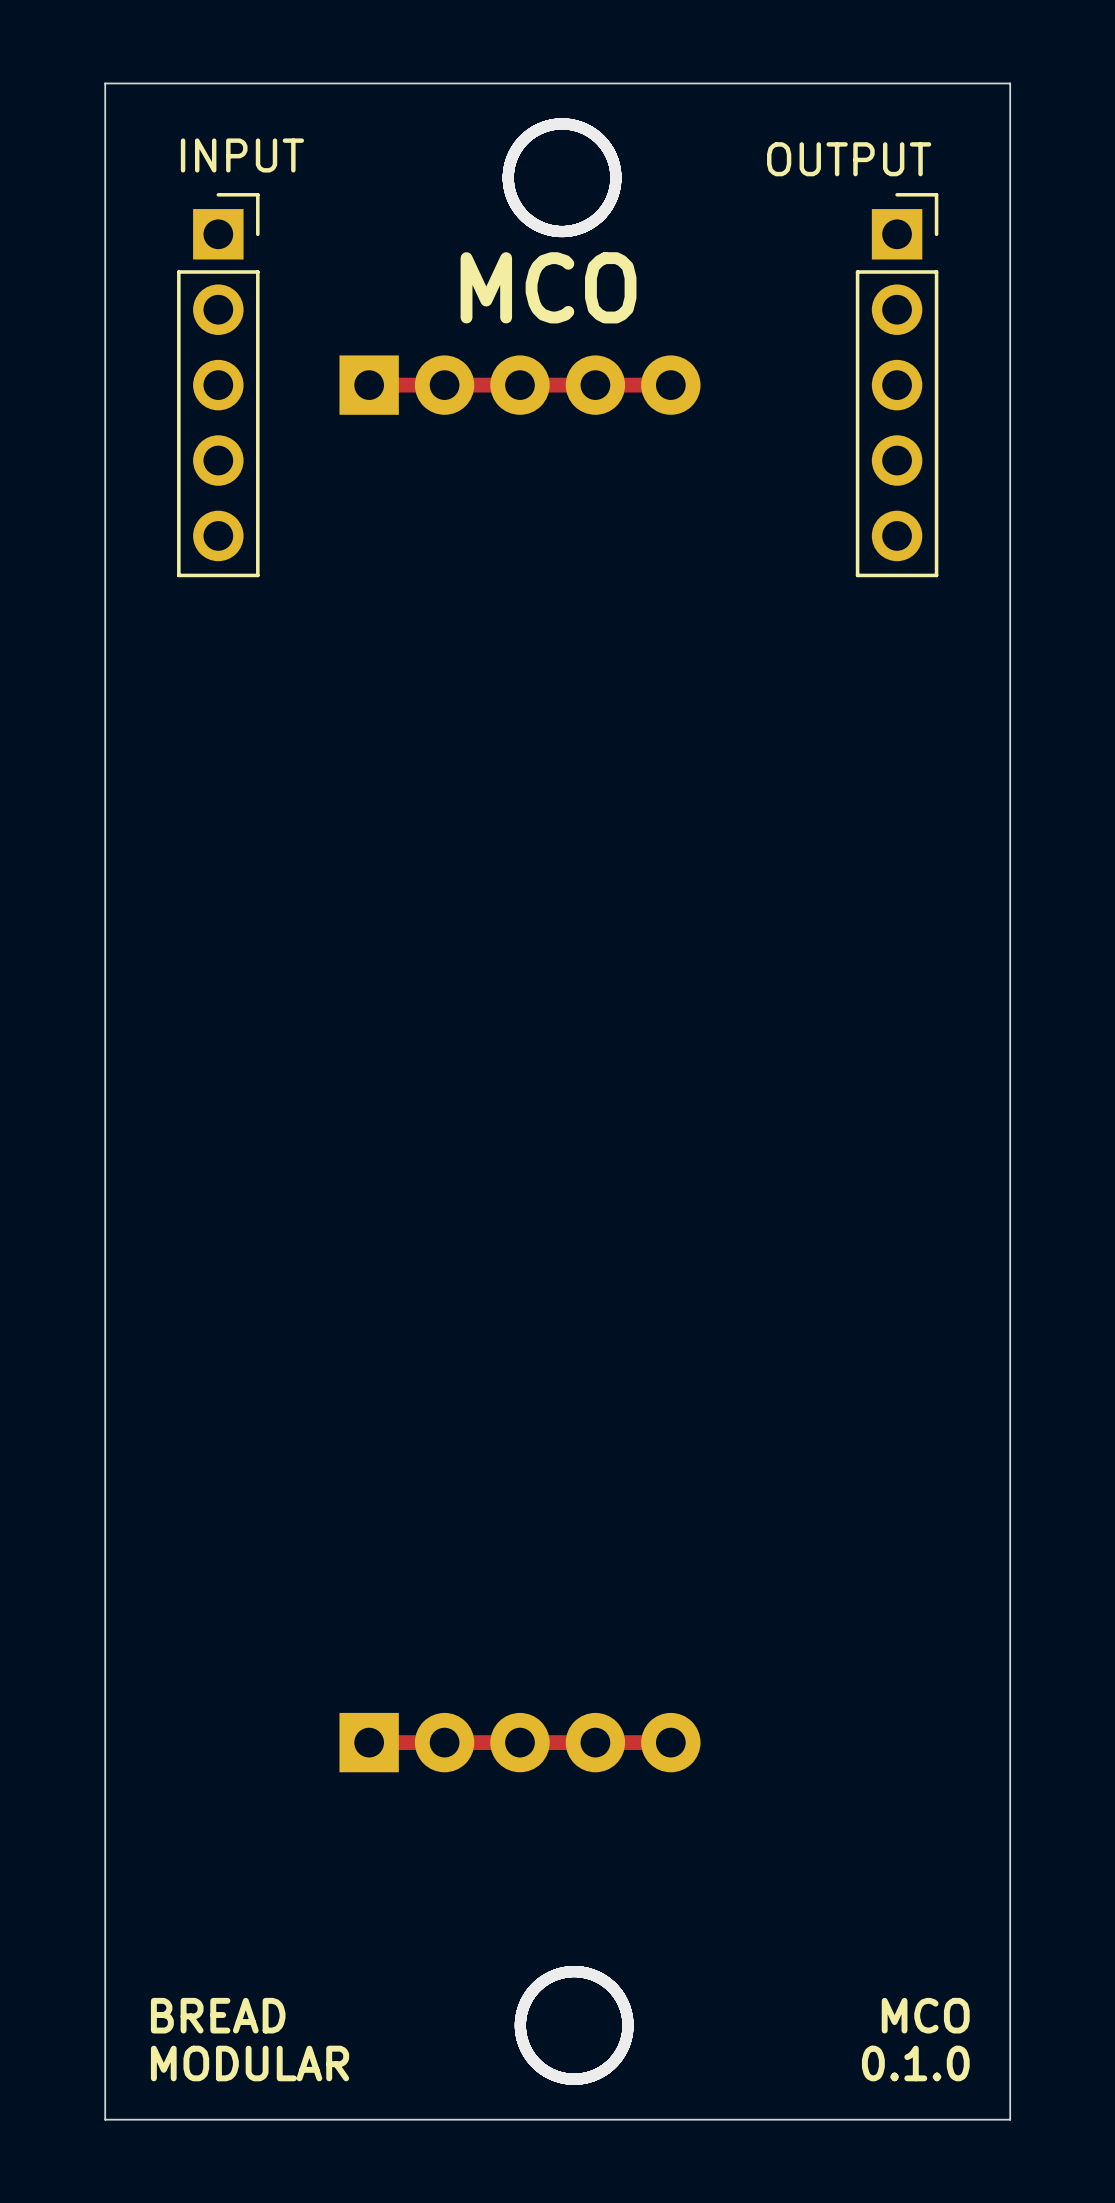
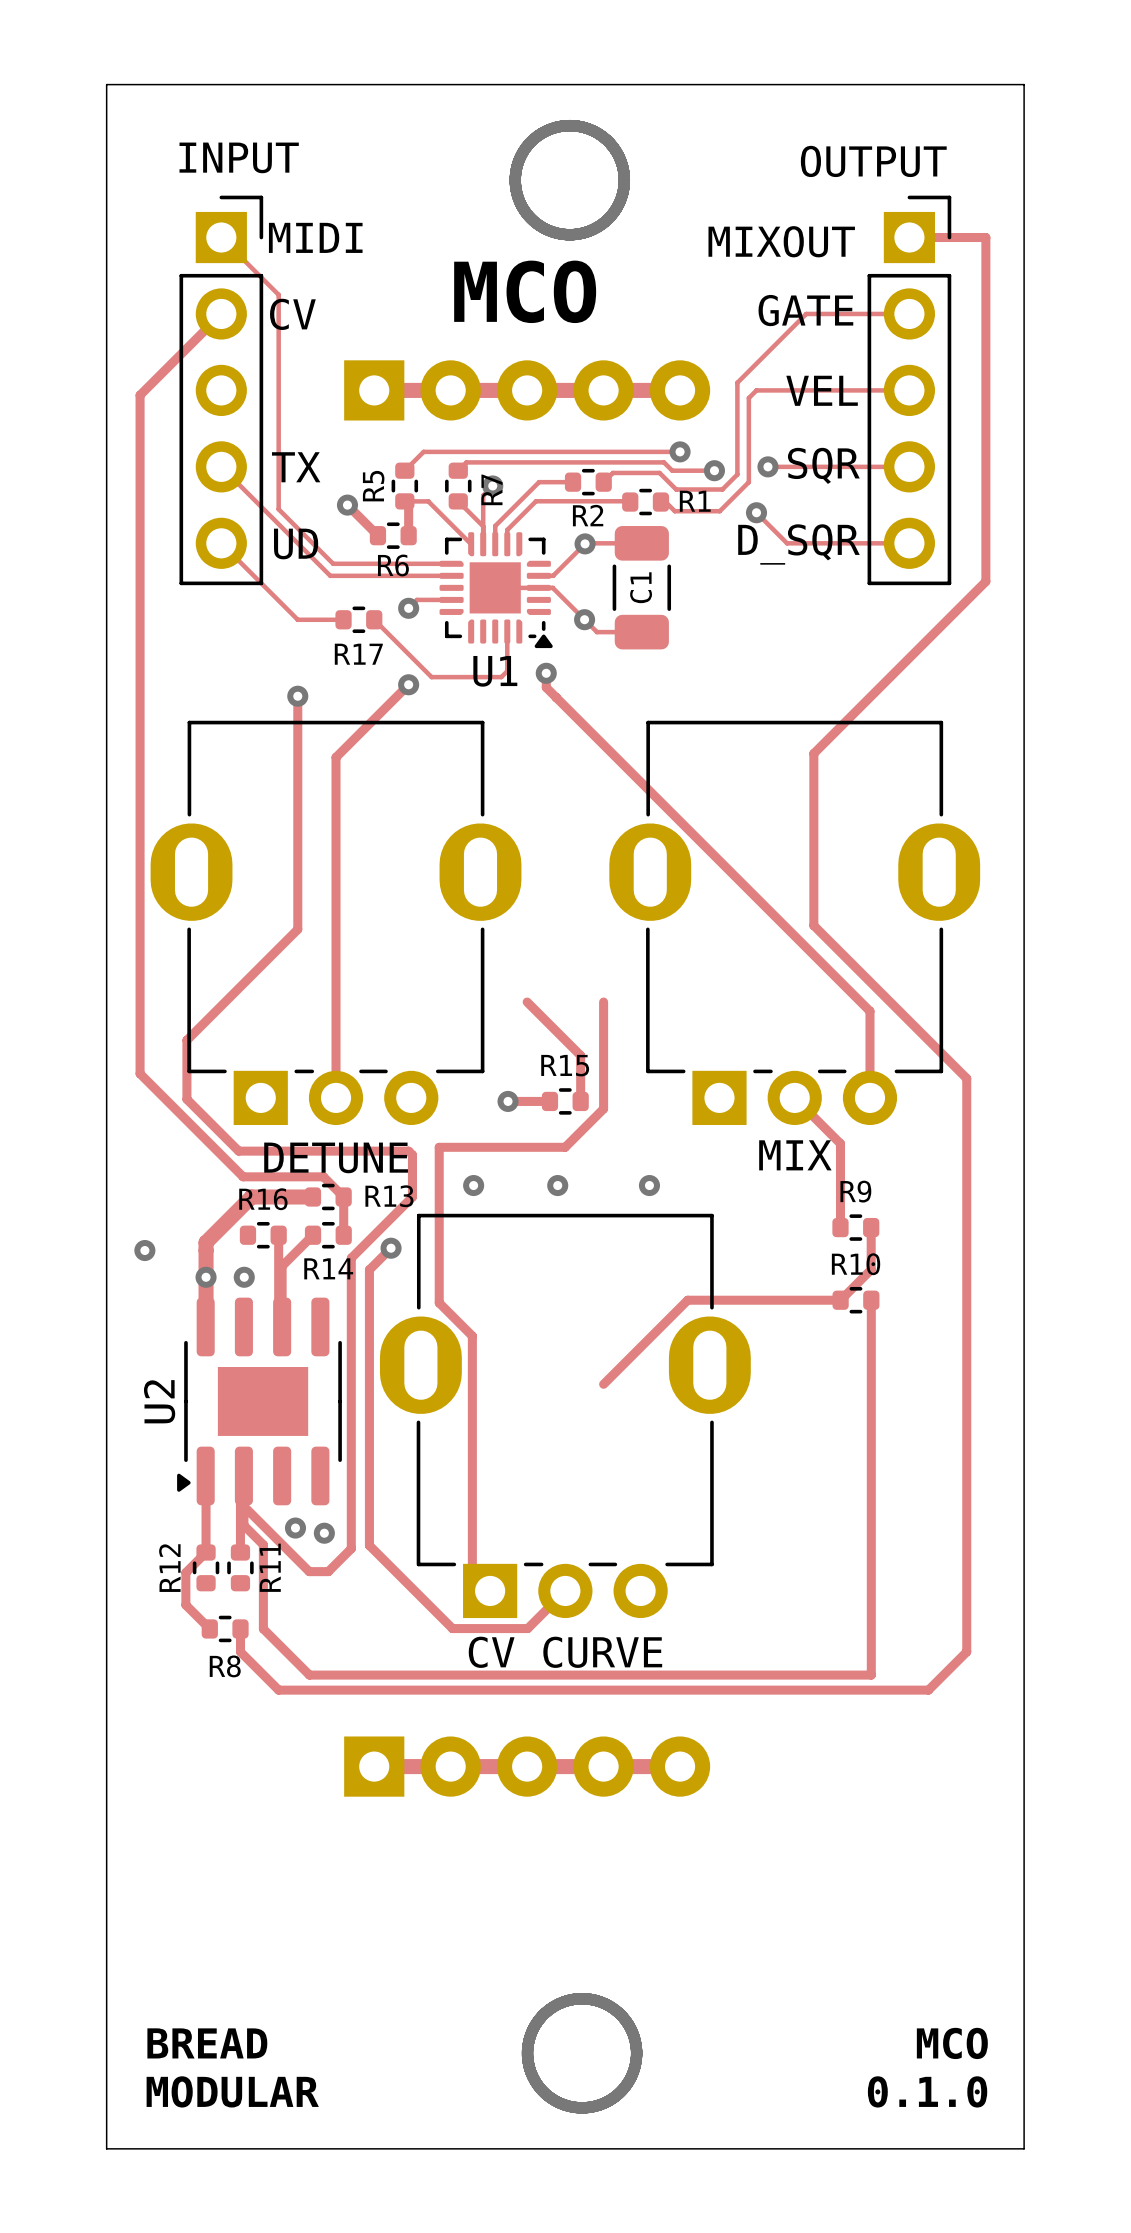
track: none -> (221, 237) (278, 294) (278, 509) (333, 563) (451, 563)
text: none -> MIDI (315, 237)
track: none -> (909, 237) (985, 237) (985, 581) (813, 753) (813, 925) (966, 1078) (966, 1651) (928, 1690) (278, 1690) (240, 1651) (240, 1628)
text: none -> MIXOUT (781, 241)
text: none -> GATE (805, 310)
track: none -> (221, 313) (140, 395) (140, 1073) (243, 1176) (323, 1176) (343, 1197) (343, 1235)
track: none -> (909, 313) (806, 313) (737, 382) (737, 474) (722, 489) (676, 489) (659, 472) (612, 472) (603, 482)
text: none -> CV (292, 314)
text: none -> VEL (822, 390)
track: none -> (909, 390) (756, 390) (748, 398) (748, 482) (719, 511) (674, 511) (661, 497)
track: none -> (680, 451) (423, 451) (404, 470)
via: none -> (680, 451)
text: none -> SQR (823, 465)
track: none -> (221, 466) (330, 575) (451, 575)
text: none -> TX (296, 467)
track: none -> (767, 466) (909, 466)
via: none -> (767, 466)
track: none -> (458, 470) (466, 462) (663, 462) (672, 470) (714, 470)
via: none -> (714, 470)
track: none -> (573, 482) (539, 482) (495, 525) (495, 544)
R2: none -> (588, 482)
R5: none -> (404, 486)
R7: none -> (458, 486)
track: none -> (492, 485) (483, 495) (483, 544)
via: none -> (492, 485)
track: none -> (630, 497) (626, 501) (535, 501) (507, 529) (507, 544)
track: none -> (458, 501) (483, 526)
R1: none -> (645, 502)
track: none -> (347, 505) (377, 535)
via: none -> (347, 505)
track: none -> (756, 512) (787, 543) (909, 543)
via: none -> (756, 512)
R6: none -> (393, 535)
track: none -> (408, 535) (408, 505) (404, 501) (428, 501) (471, 544)
text: none -> D_SQR (798, 544)
track: none -> (221, 543) (297, 619) (343, 619)
track: none -> (641, 543) (585, 543) (553, 575) (538, 575)
text: none -> UD (296, 544)
via: none -> (585, 543)
track: none -> (495, 587) (552, 587) (597, 632) (641, 632)
C1: none -> (641, 587)
U1: none -> (496, 590)
track: none -> (451, 599) (417, 599) (408, 608)
via: none -> (408, 608)
R17: none -> (358, 619)
track: none -> (374, 619) (431, 677) (501, 677) (507, 671) (507, 631)
via: none -> (584, 619)
track: none -> (546, 673) (546, 687) (869, 1011) (869, 1097)
via: none -> (546, 673)
track: none -> (408, 684) (336, 757) (336, 1097)
via: none -> (408, 684)
track: none -> (297, 696) (297, 929) (186, 1040) (186, 1099) (238, 1151) (408, 1151) (412, 1154) (412, 1197) (351, 1258) (351, 1548) (328, 1571) (309, 1571) (243, 1506)
via: none -> (297, 696)
part: none -> (336, 922)
part: none -> (794, 922)
track: none -> (527, 1002) (580, 1055) (580, 1101)
track: none -> (603, 1002) (603, 1108) (565, 1147) (439, 1147) (439, 1302) (472, 1336) (472, 1573) (490, 1590)
track: none -> (794, 1097) (840, 1143) (840, 1227)
track: none -> (508, 1101) (549, 1101)
via: none -> (508, 1101)
R15: none -> (565, 1101)
text: none -> MIX (795, 1155)
text: none -> DETUNE (336, 1157)
via: none -> (473, 1185)
via: none -> (557, 1185)
via: none -> (649, 1185)
track: none -> (312, 1197) (251, 1197) (206, 1242) (206, 1326)
R13: none -> (328, 1197)
R9: none -> (855, 1227)
track: none -> (871, 1227) (871, 1269) (840, 1300) (687, 1300) (603, 1384)
R16: none -> (263, 1235)
track: none -> (278, 1235) (278, 1323) (282, 1326) (282, 1266) (313, 1235)
R14: none -> (328, 1235)
track: none -> (391, 1248) (369, 1269) (369, 1545) (452, 1628) (527, 1628) (565, 1590)
via: none -> (391, 1248)
via: none -> (144, 1250)
via: none -> (206, 1277)
via: none -> (244, 1277)
R10: none -> (855, 1300)
track: none -> (871, 1300) (871, 1675) (309, 1675) (263, 1628) (263, 1544) (243, 1525) (243, 1475) (240, 1479) (240, 1552)
U2: none -> (259, 1401)
part: none -> (565, 1415)
track: none -> (206, 1476) (206, 1552) (185, 1572) (185, 1605) (209, 1628)
via: none -> (295, 1528)
via: none -> (324, 1533)
R12: none -> (206, 1567)
R11: none -> (240, 1567)
R8: none -> (225, 1628)
text: none -> CV CURVE (565, 1652)

